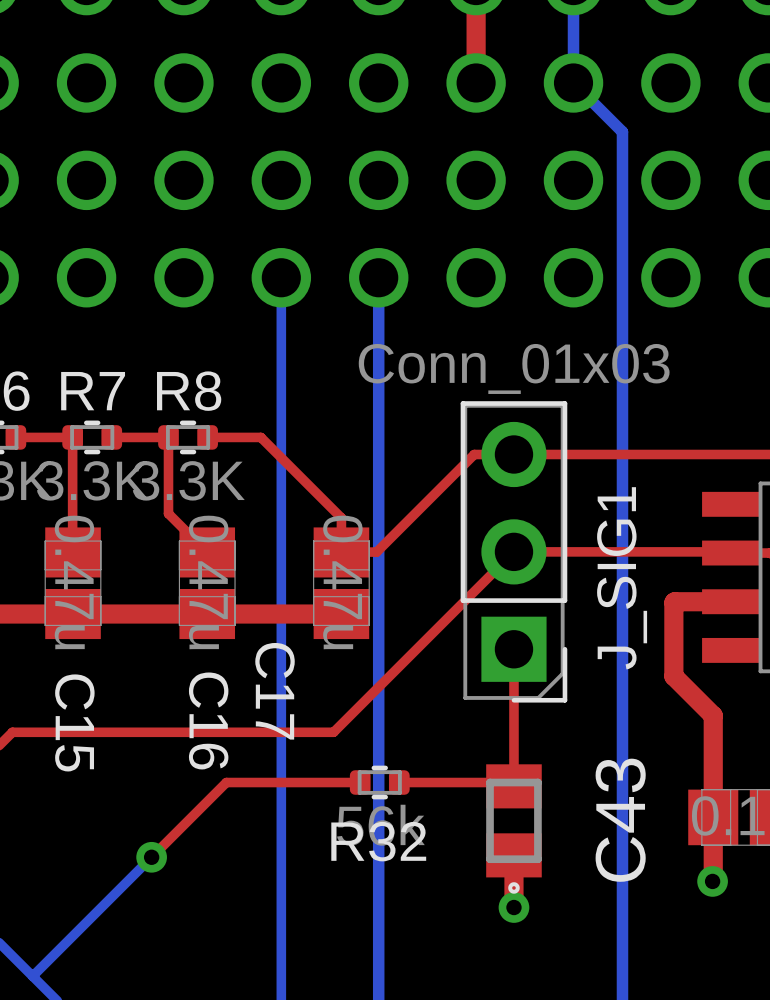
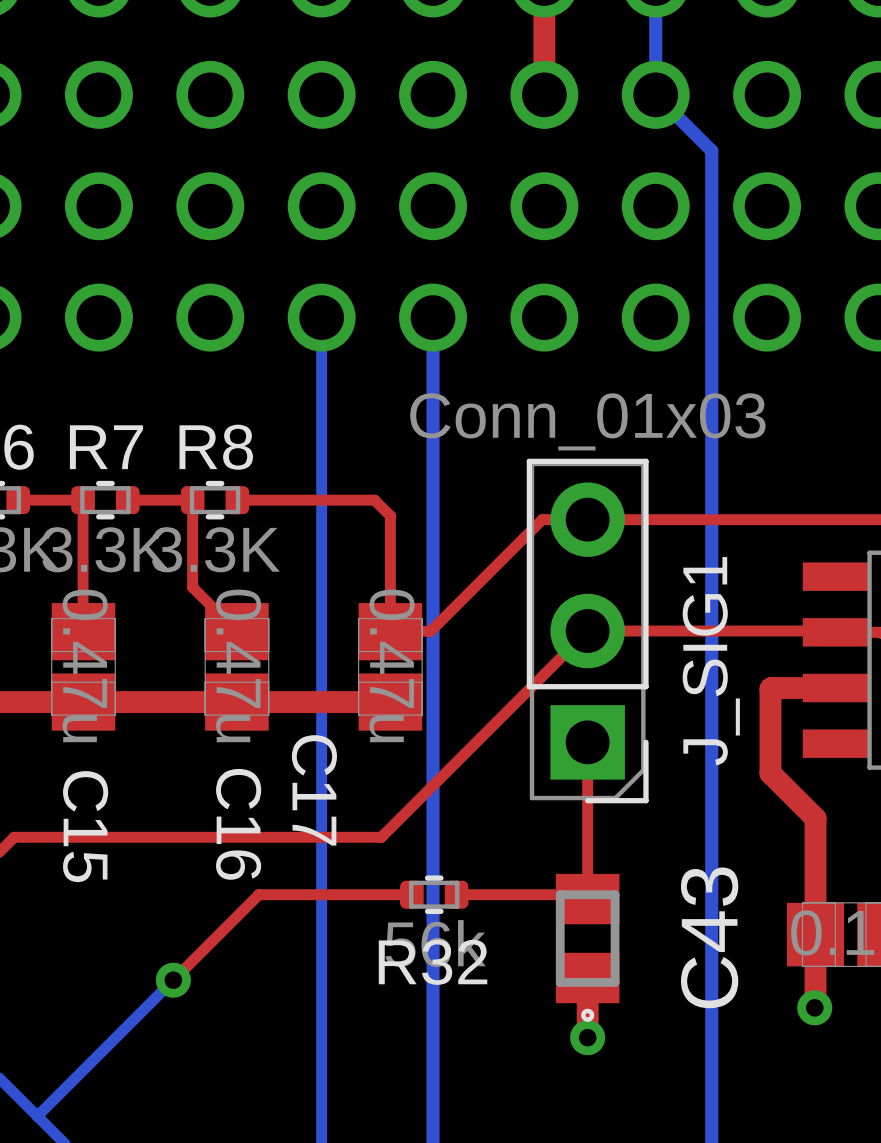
top track: (260, 437) (341, 517) -> (298, 500) (374, 500) (390, 515) (390, 592)

